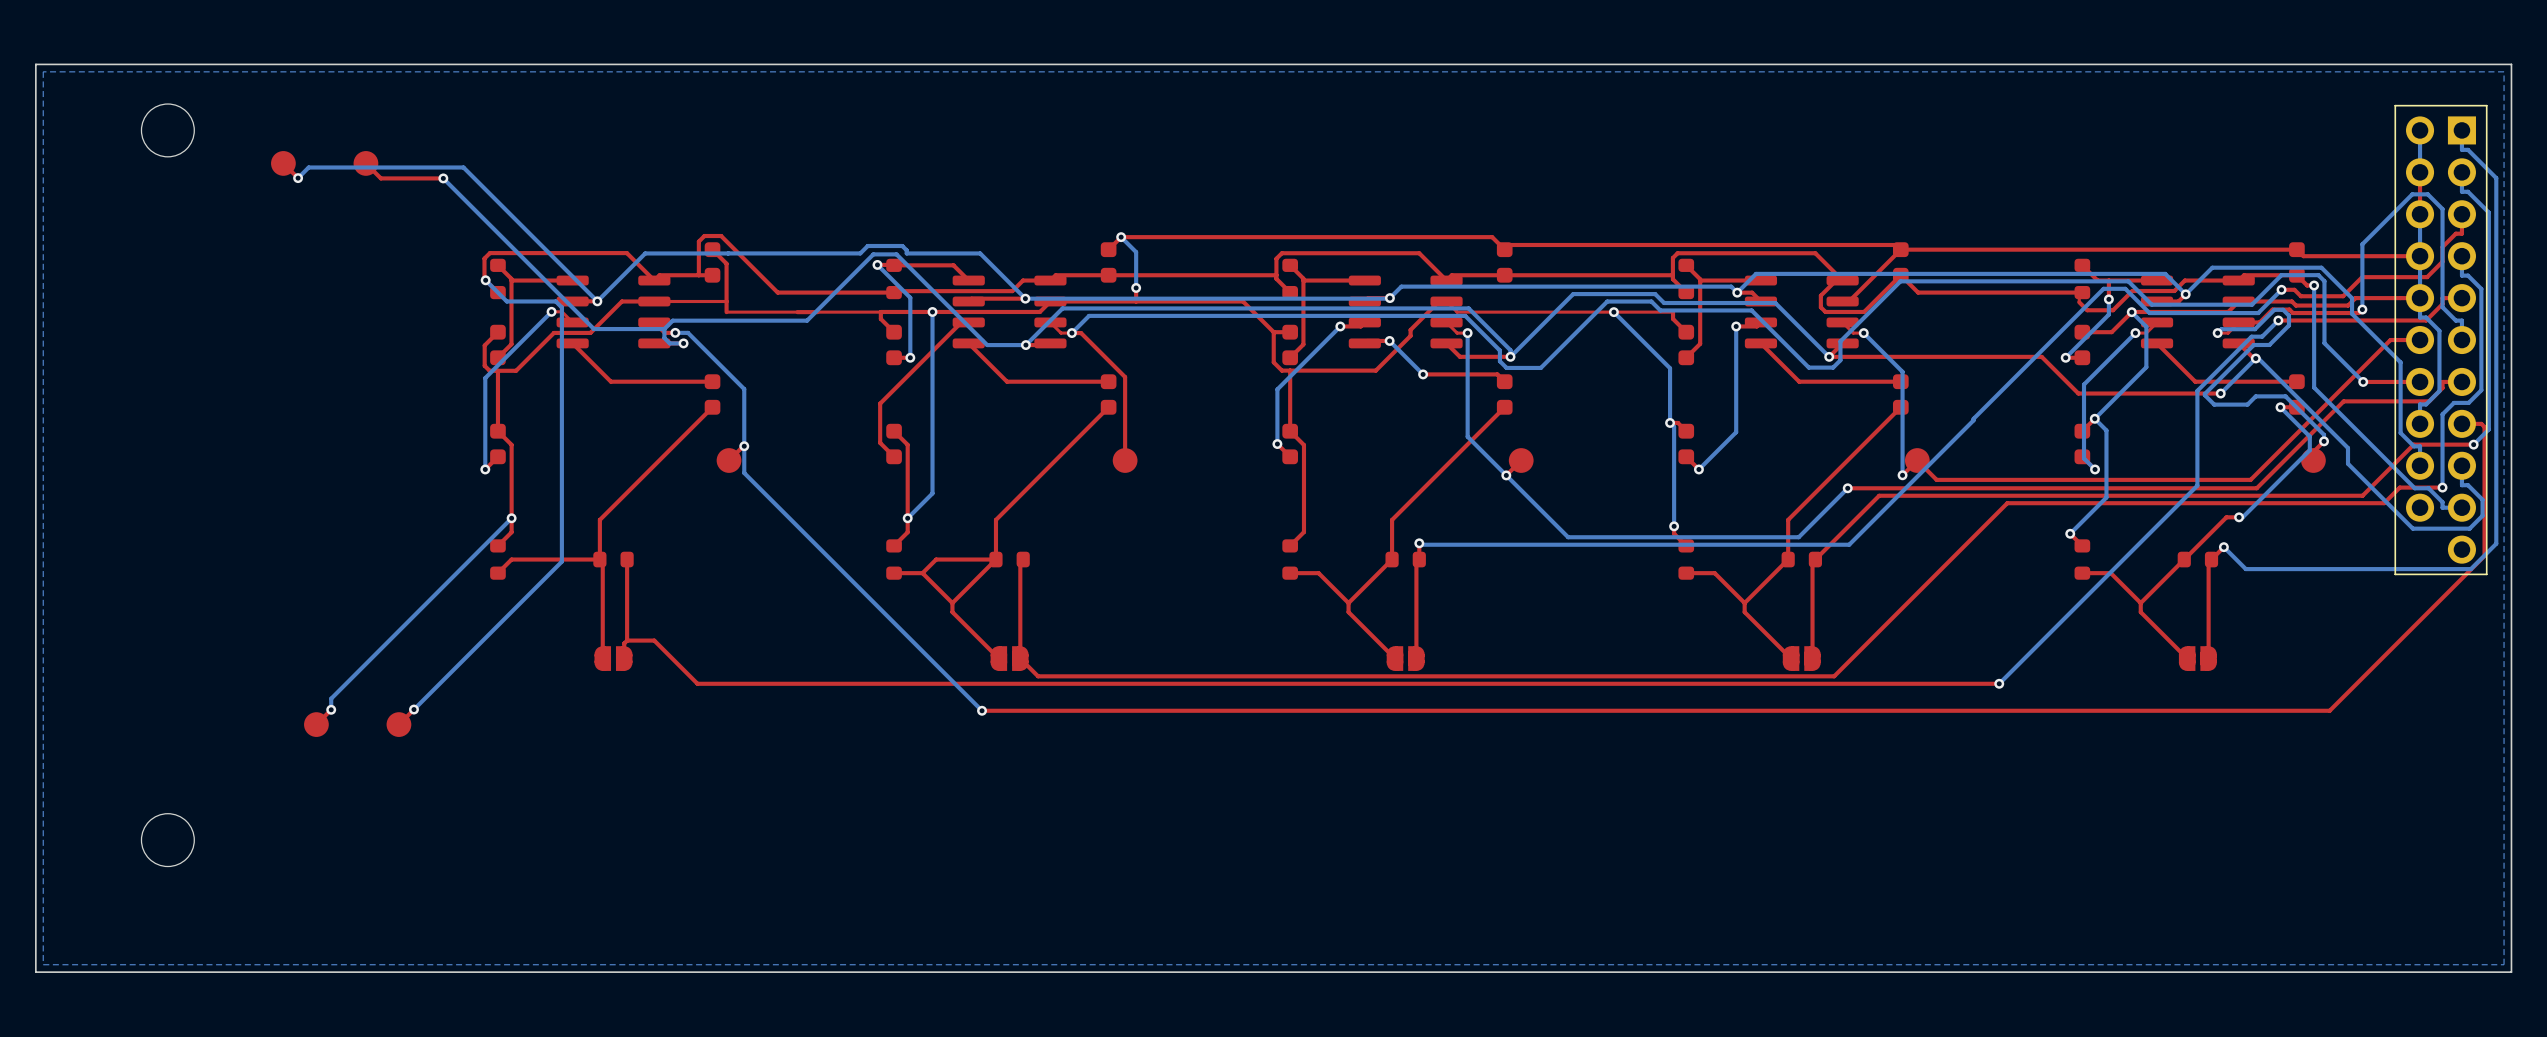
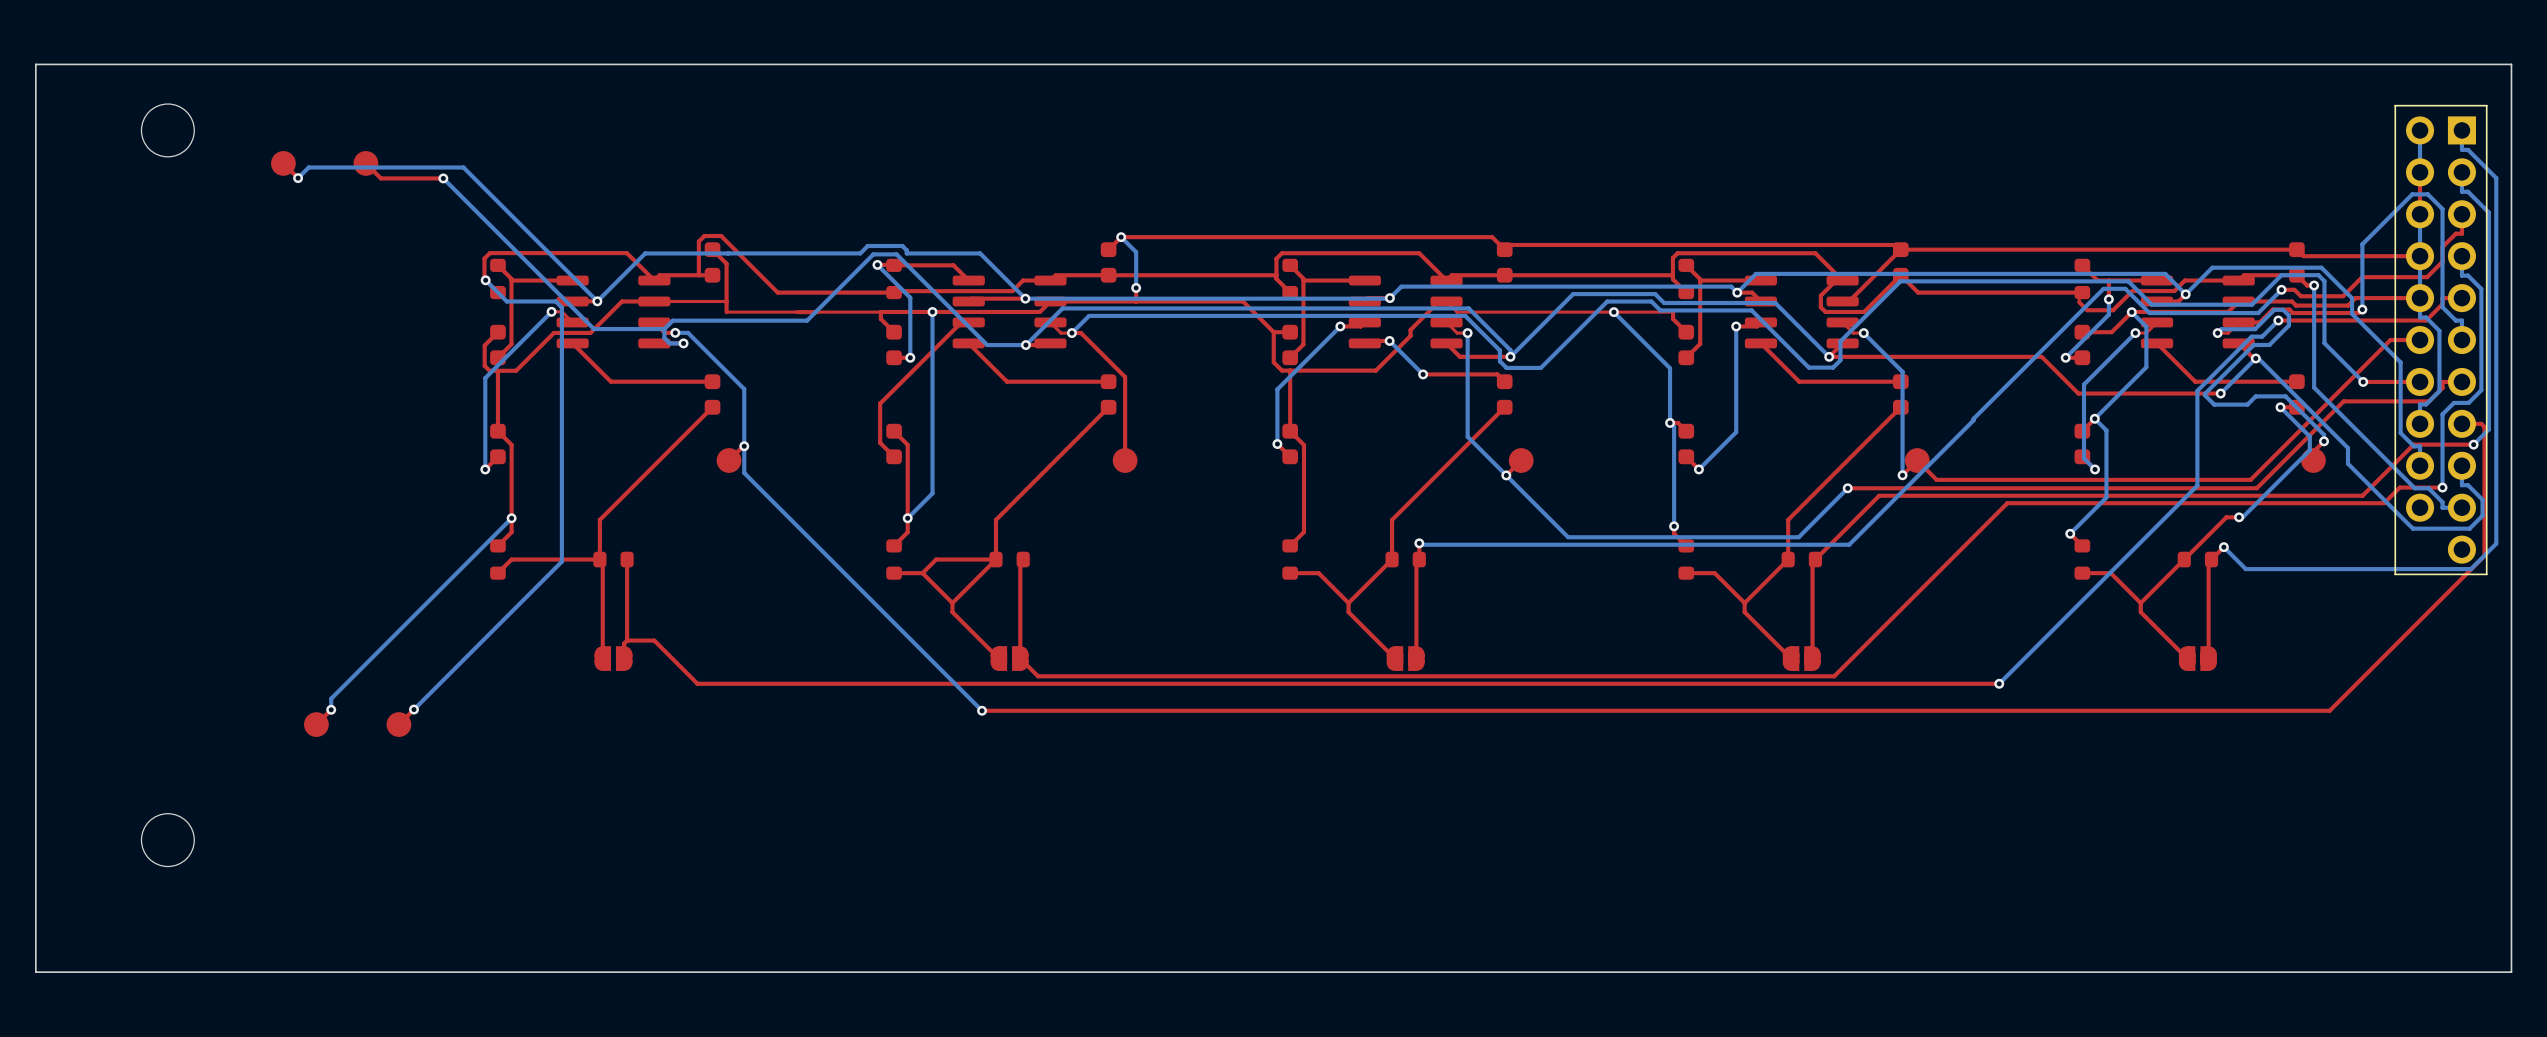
bottom zone outline: (2504, 71) (43, 71) (43, 964) (2504, 964) (2504, 71) -> none

